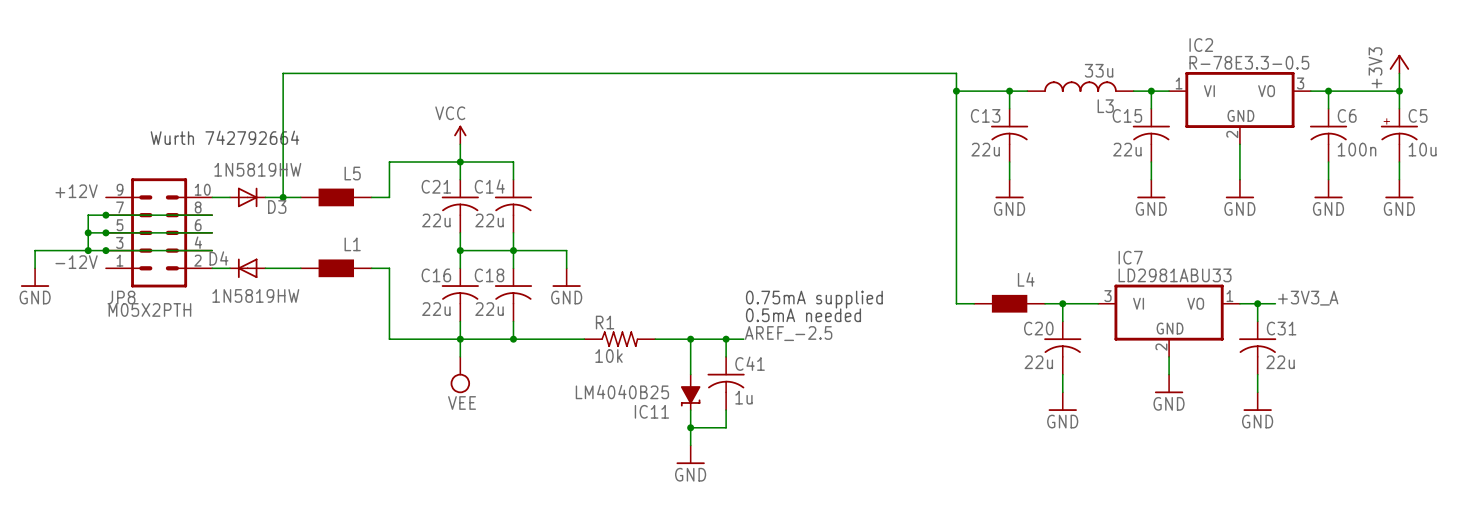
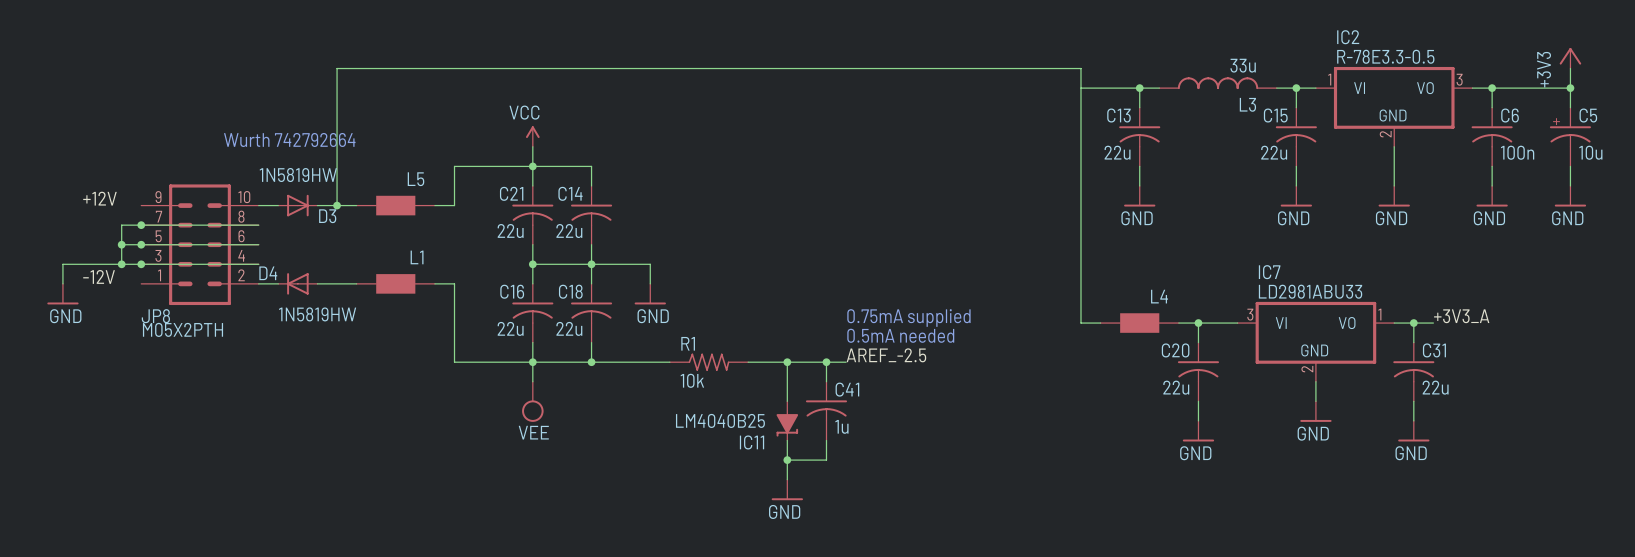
junction: (956, 91) -> none

